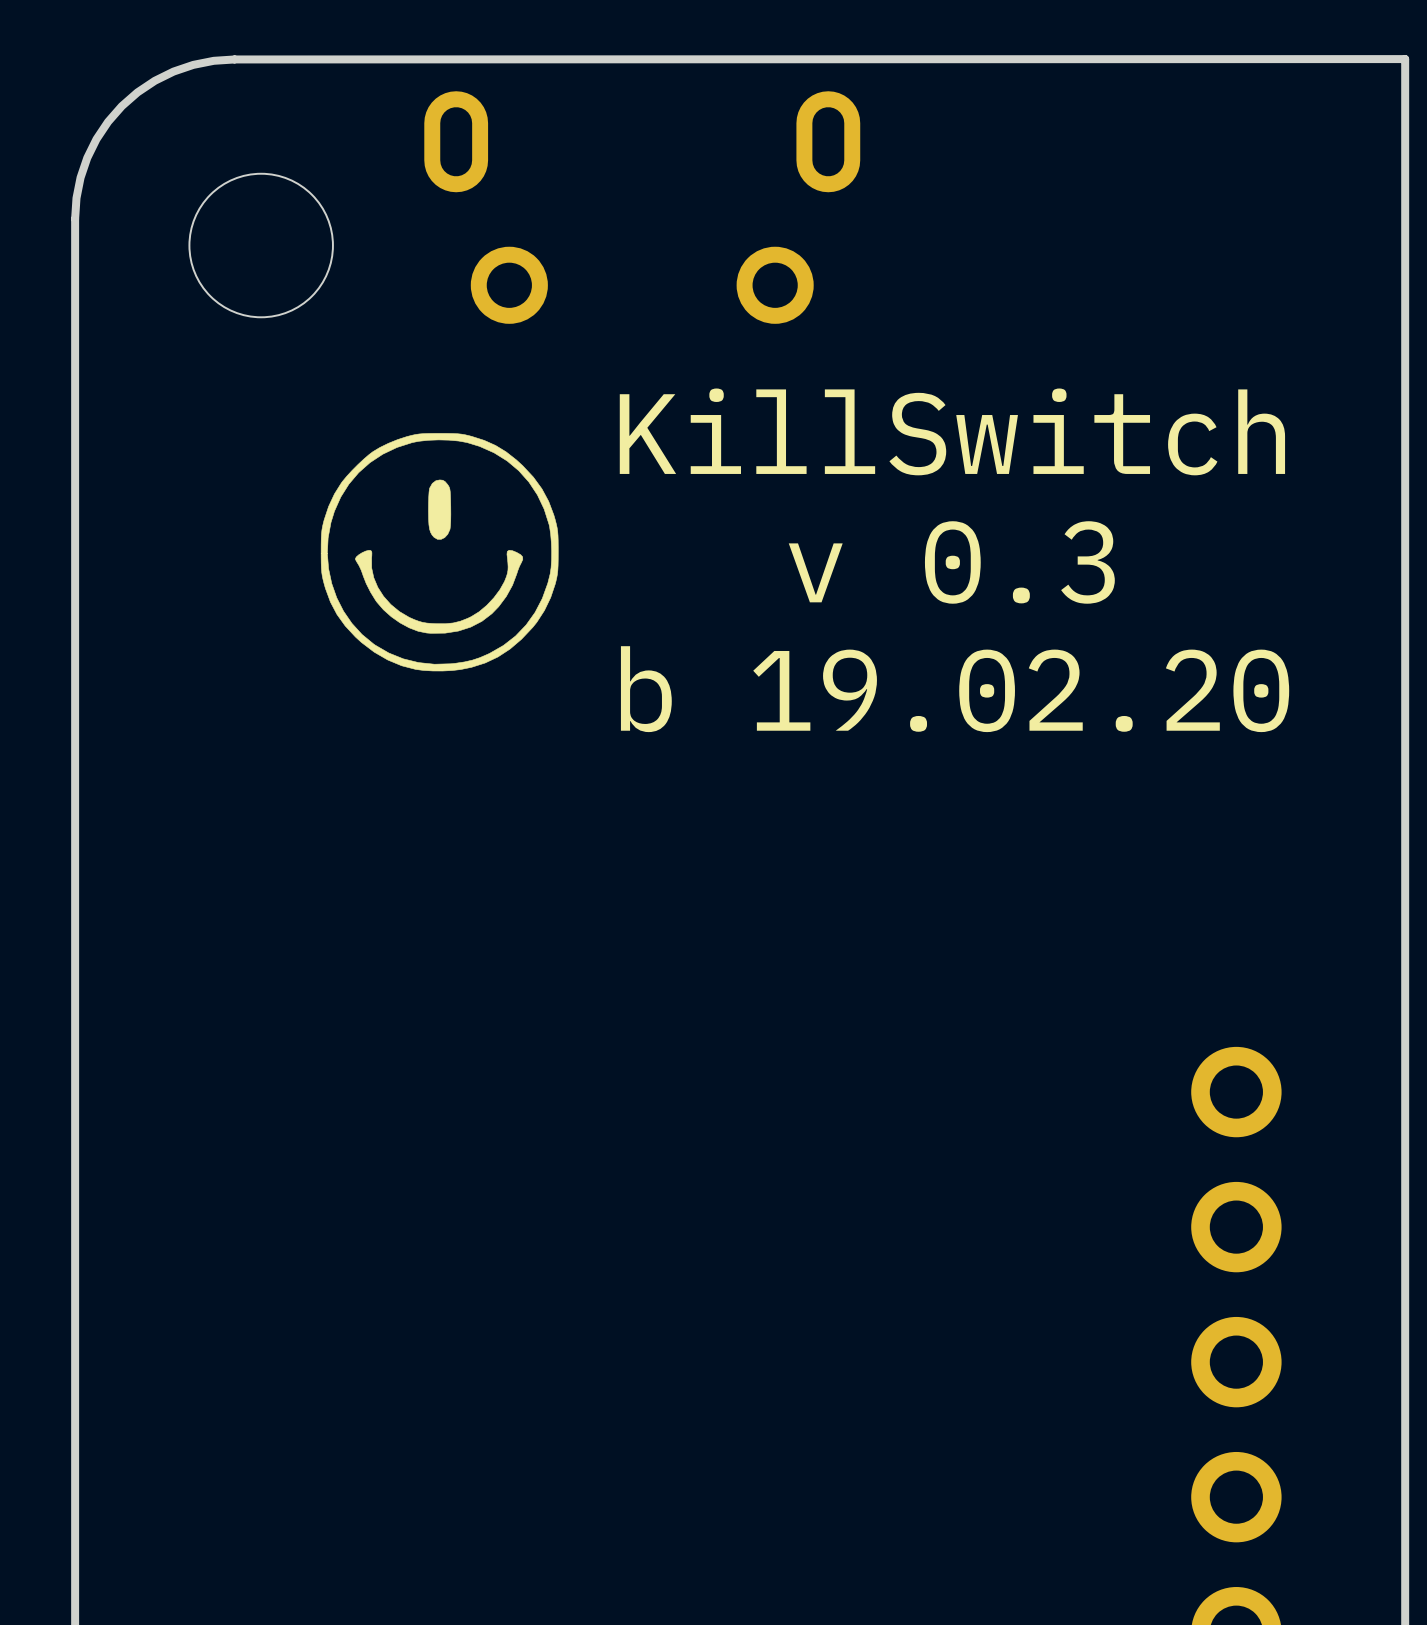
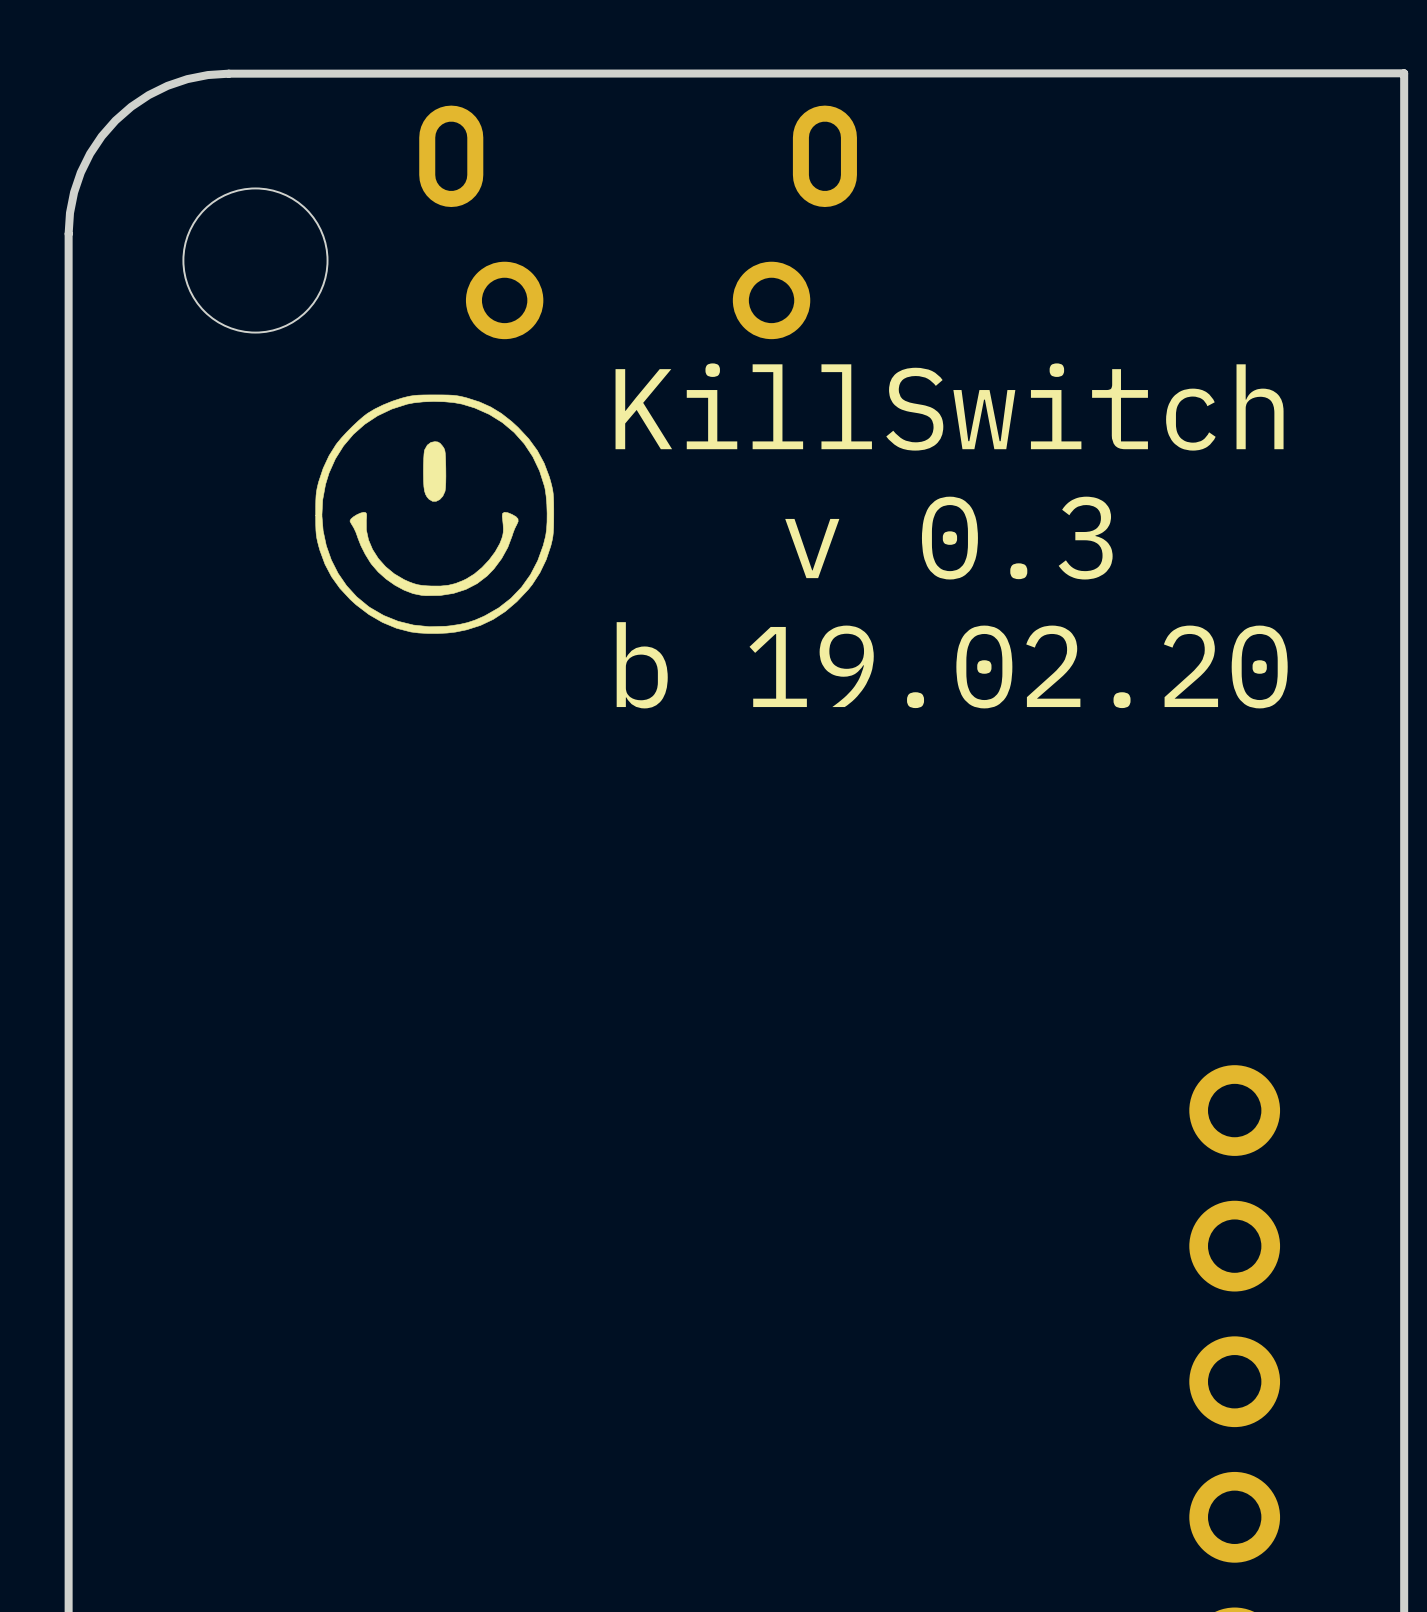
text position: KillSwitch (952, 431) -> KillSwitch (949, 406)
drawing position: (439, 552) -> (434, 514)
text position: v 0.3 (951, 562) -> v 0.3 (948, 538)
text position: b 19.02.20 (955, 689) -> b 19.02.20 (952, 665)

